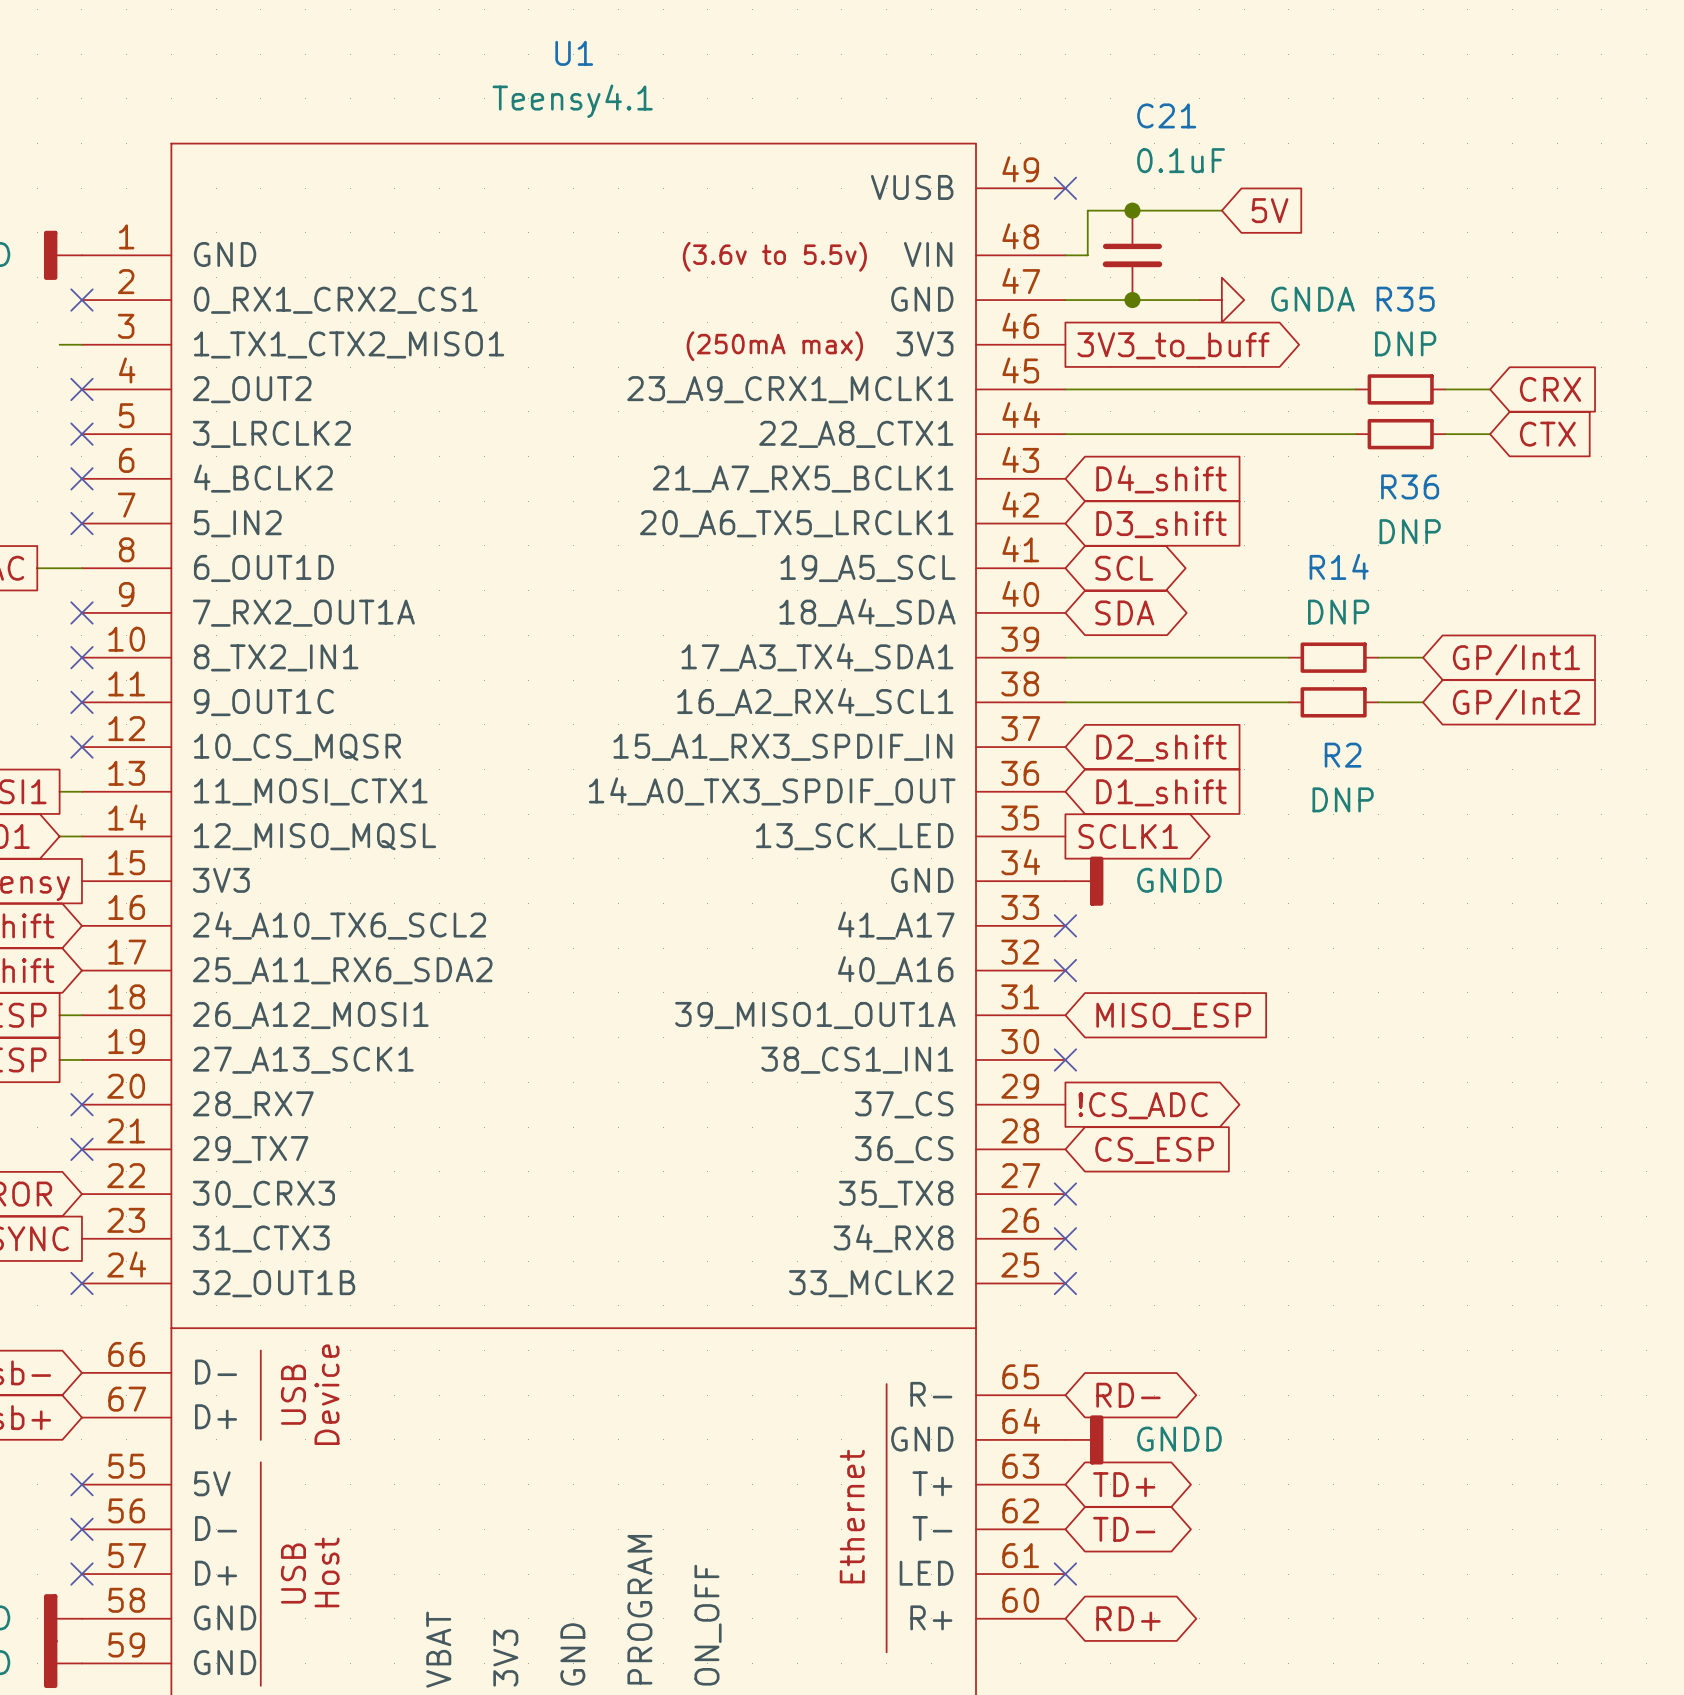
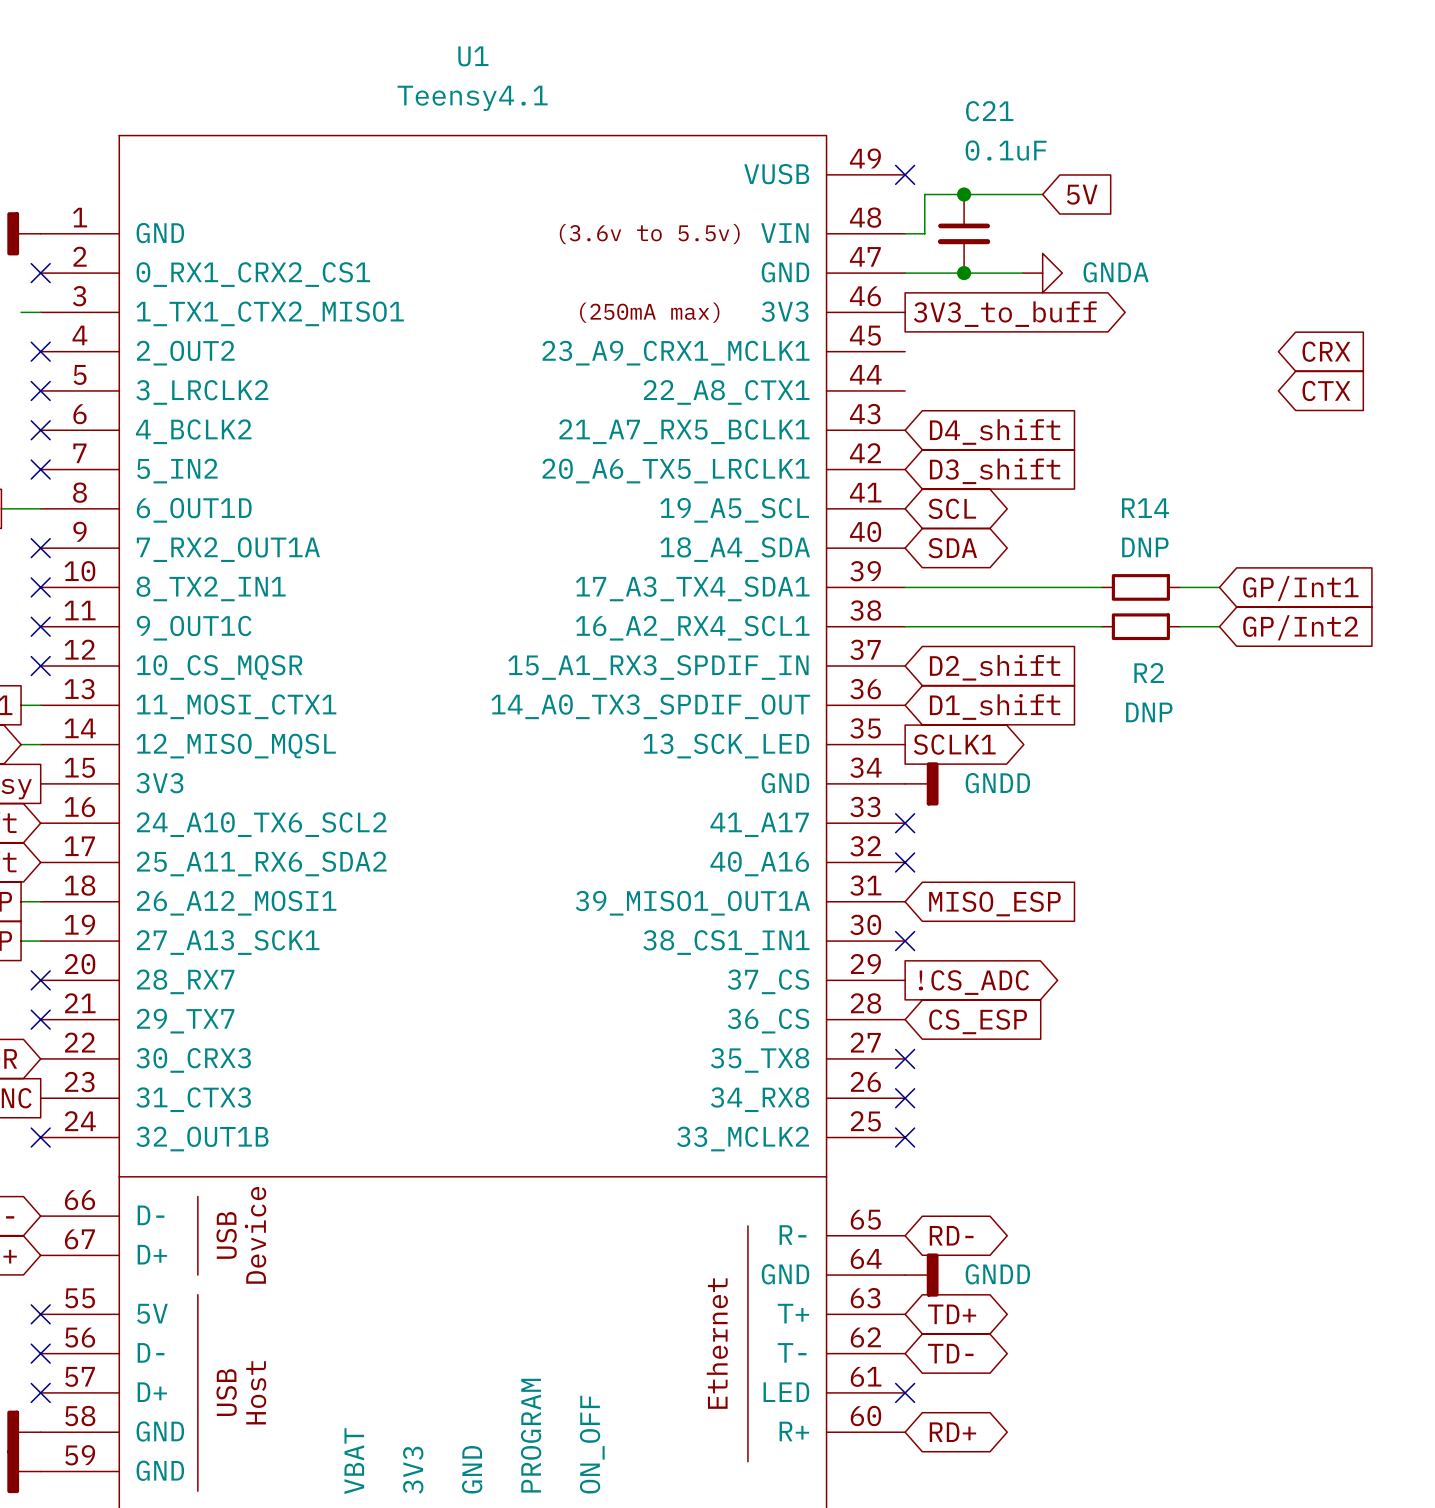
wire: (1065, 389) (1355, 389) -> none
R35: DNP (1400, 389) -> none
wire: (1445, 389) (1490, 389) -> none
wire: (1065, 434) (1355, 434) -> none
R36: DNP (1400, 434) -> none
wire: (1445, 434) (1490, 434) -> none

